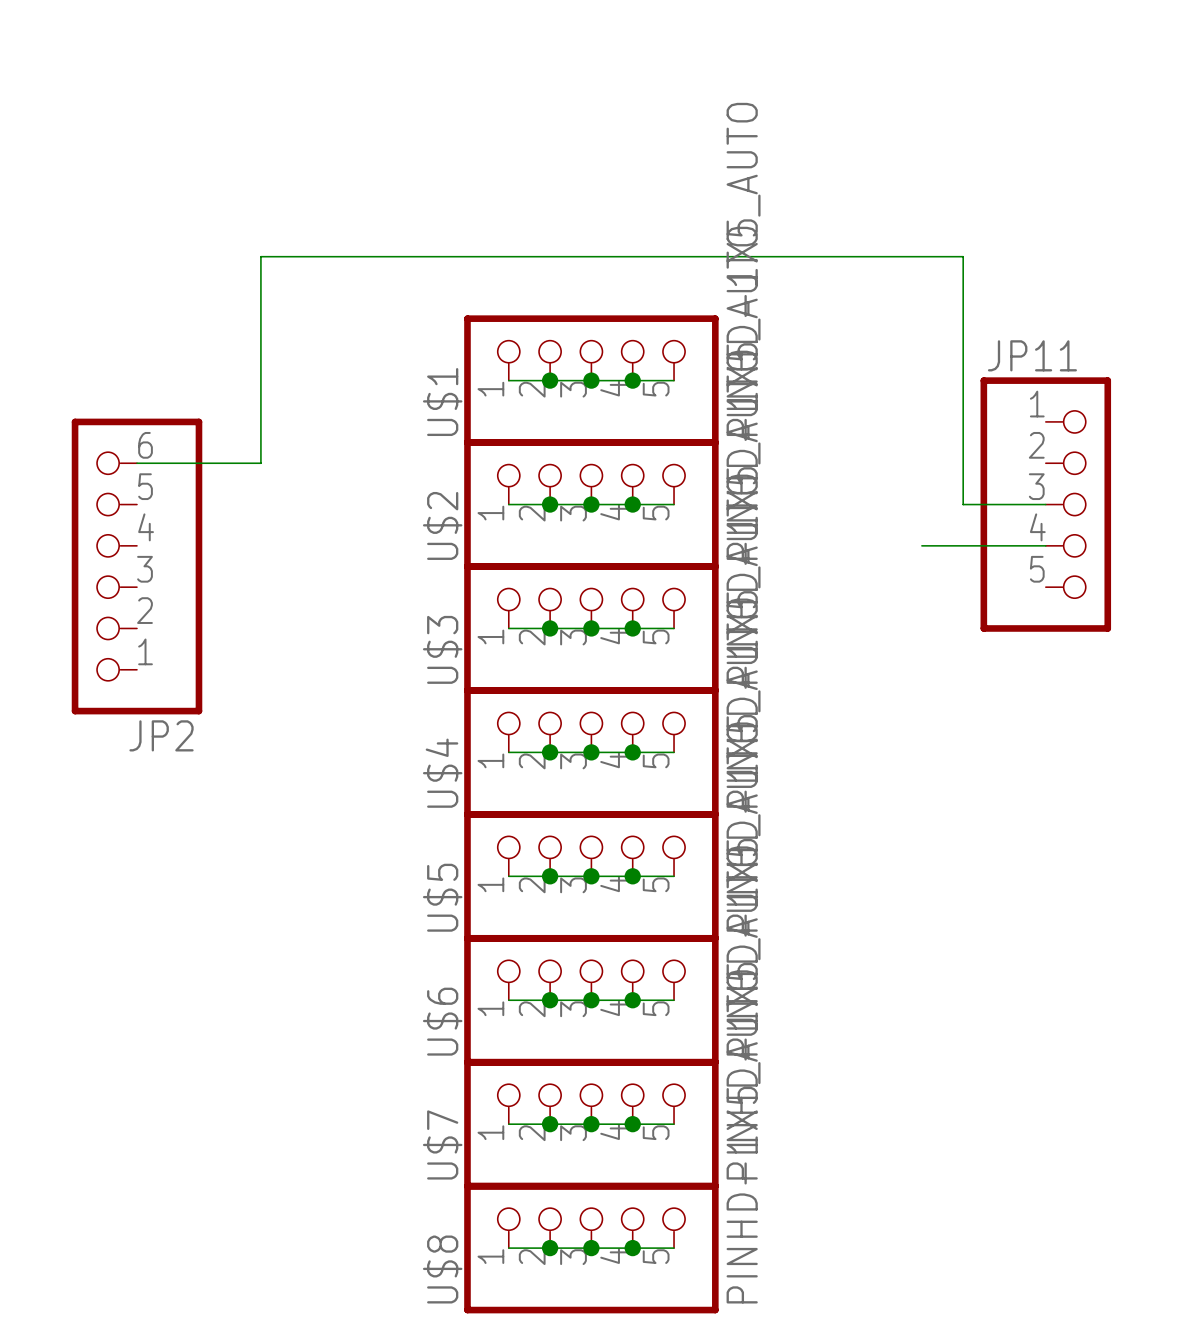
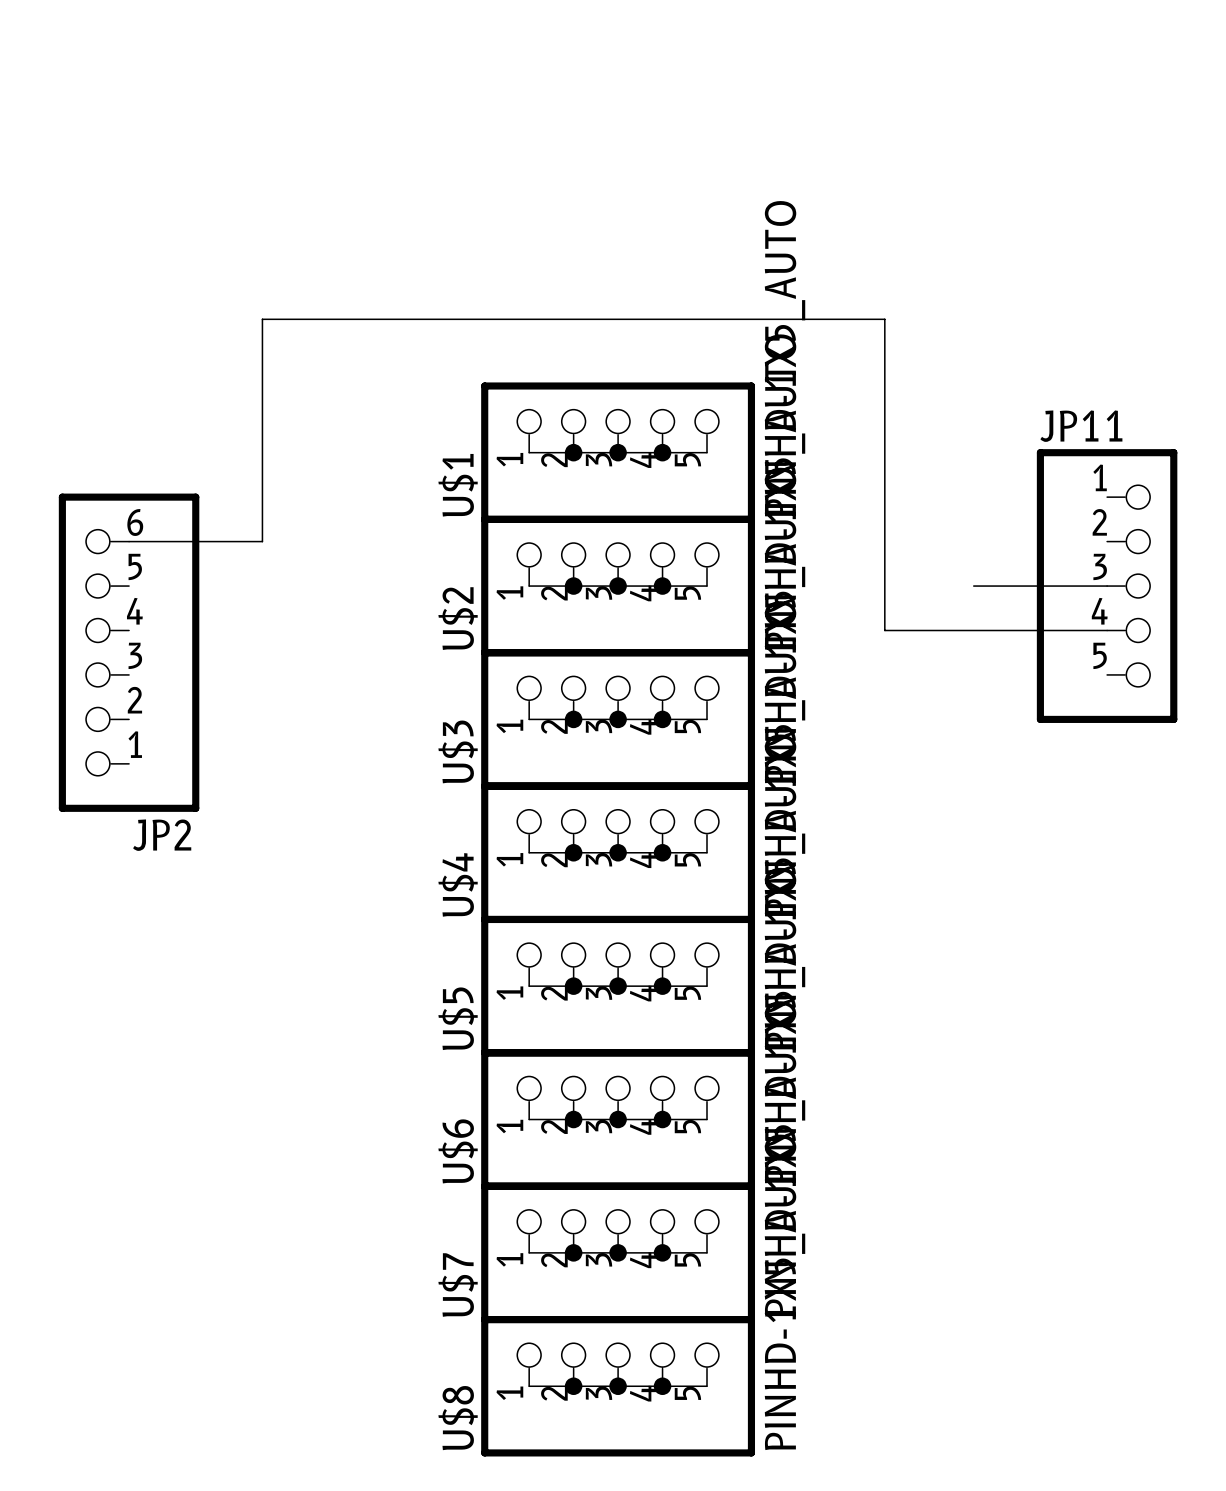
wire: (839, 256) (963, 256) (963, 504) -> (884, 319) (884, 630) (973, 630)
wire: none -> (973, 586) (1018, 586)

